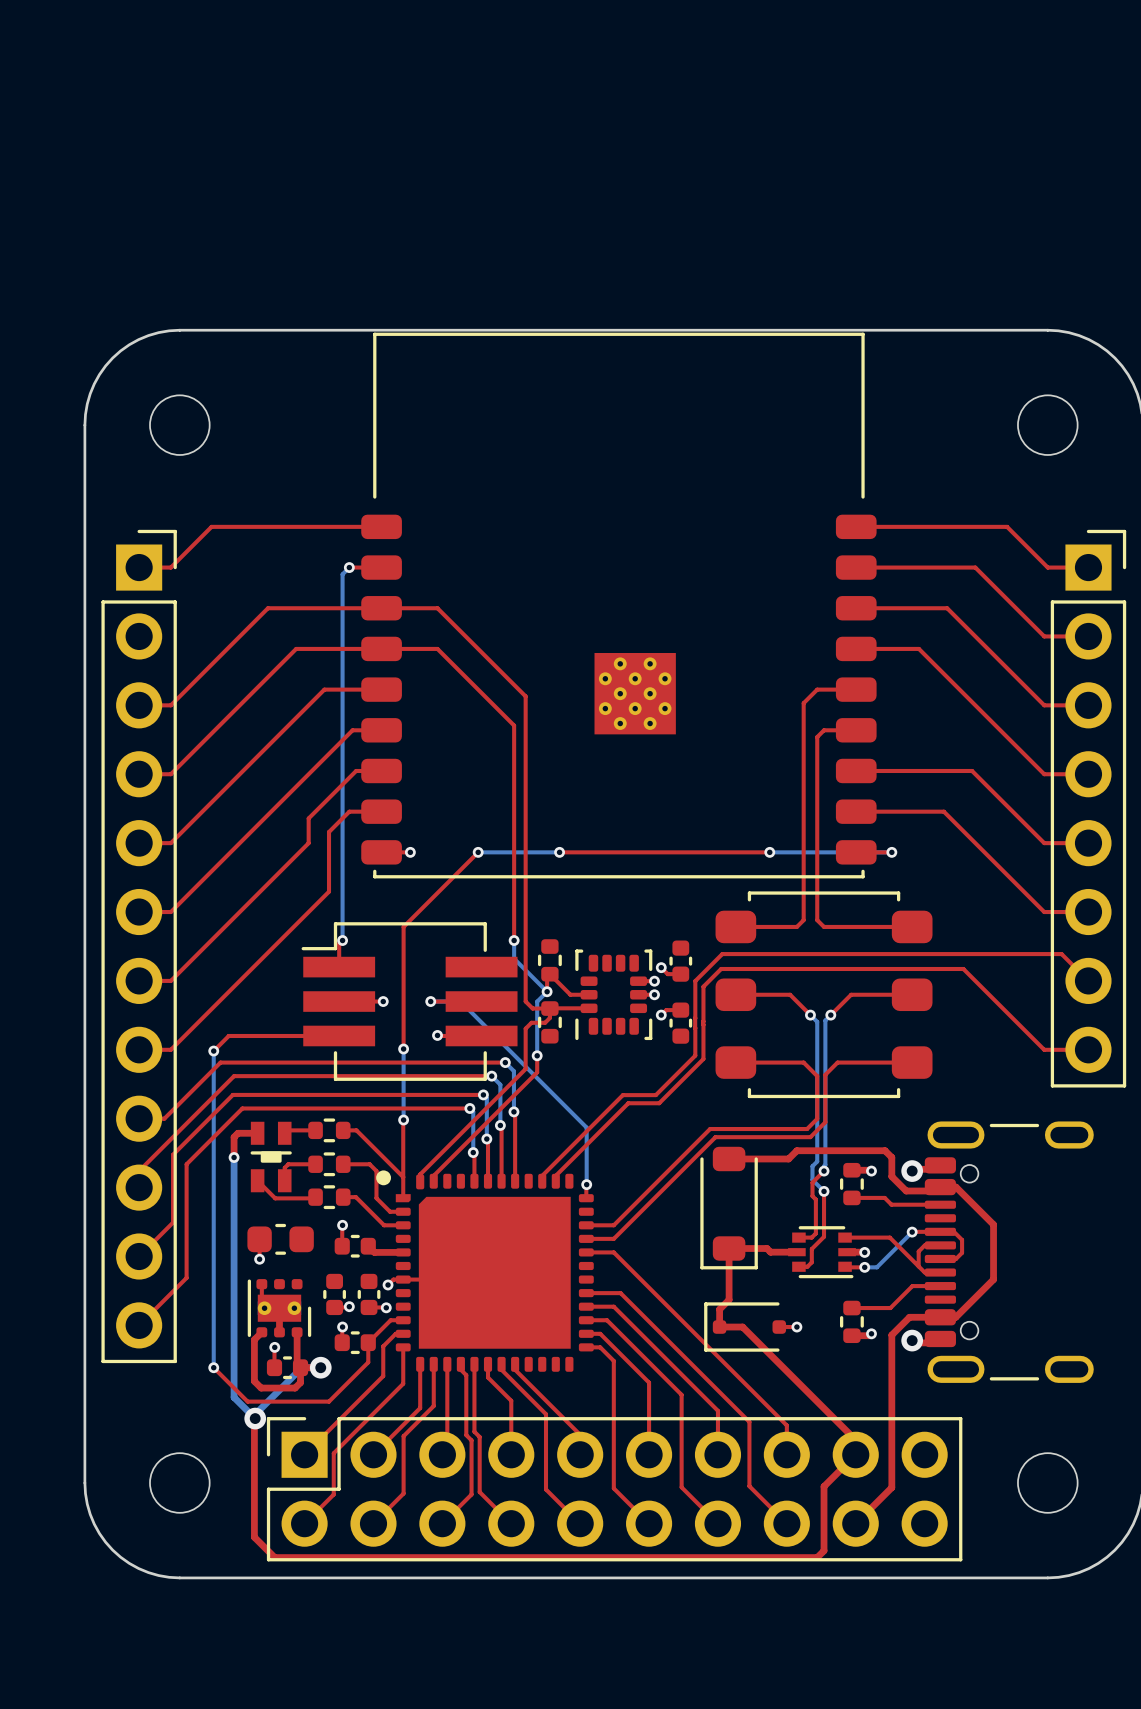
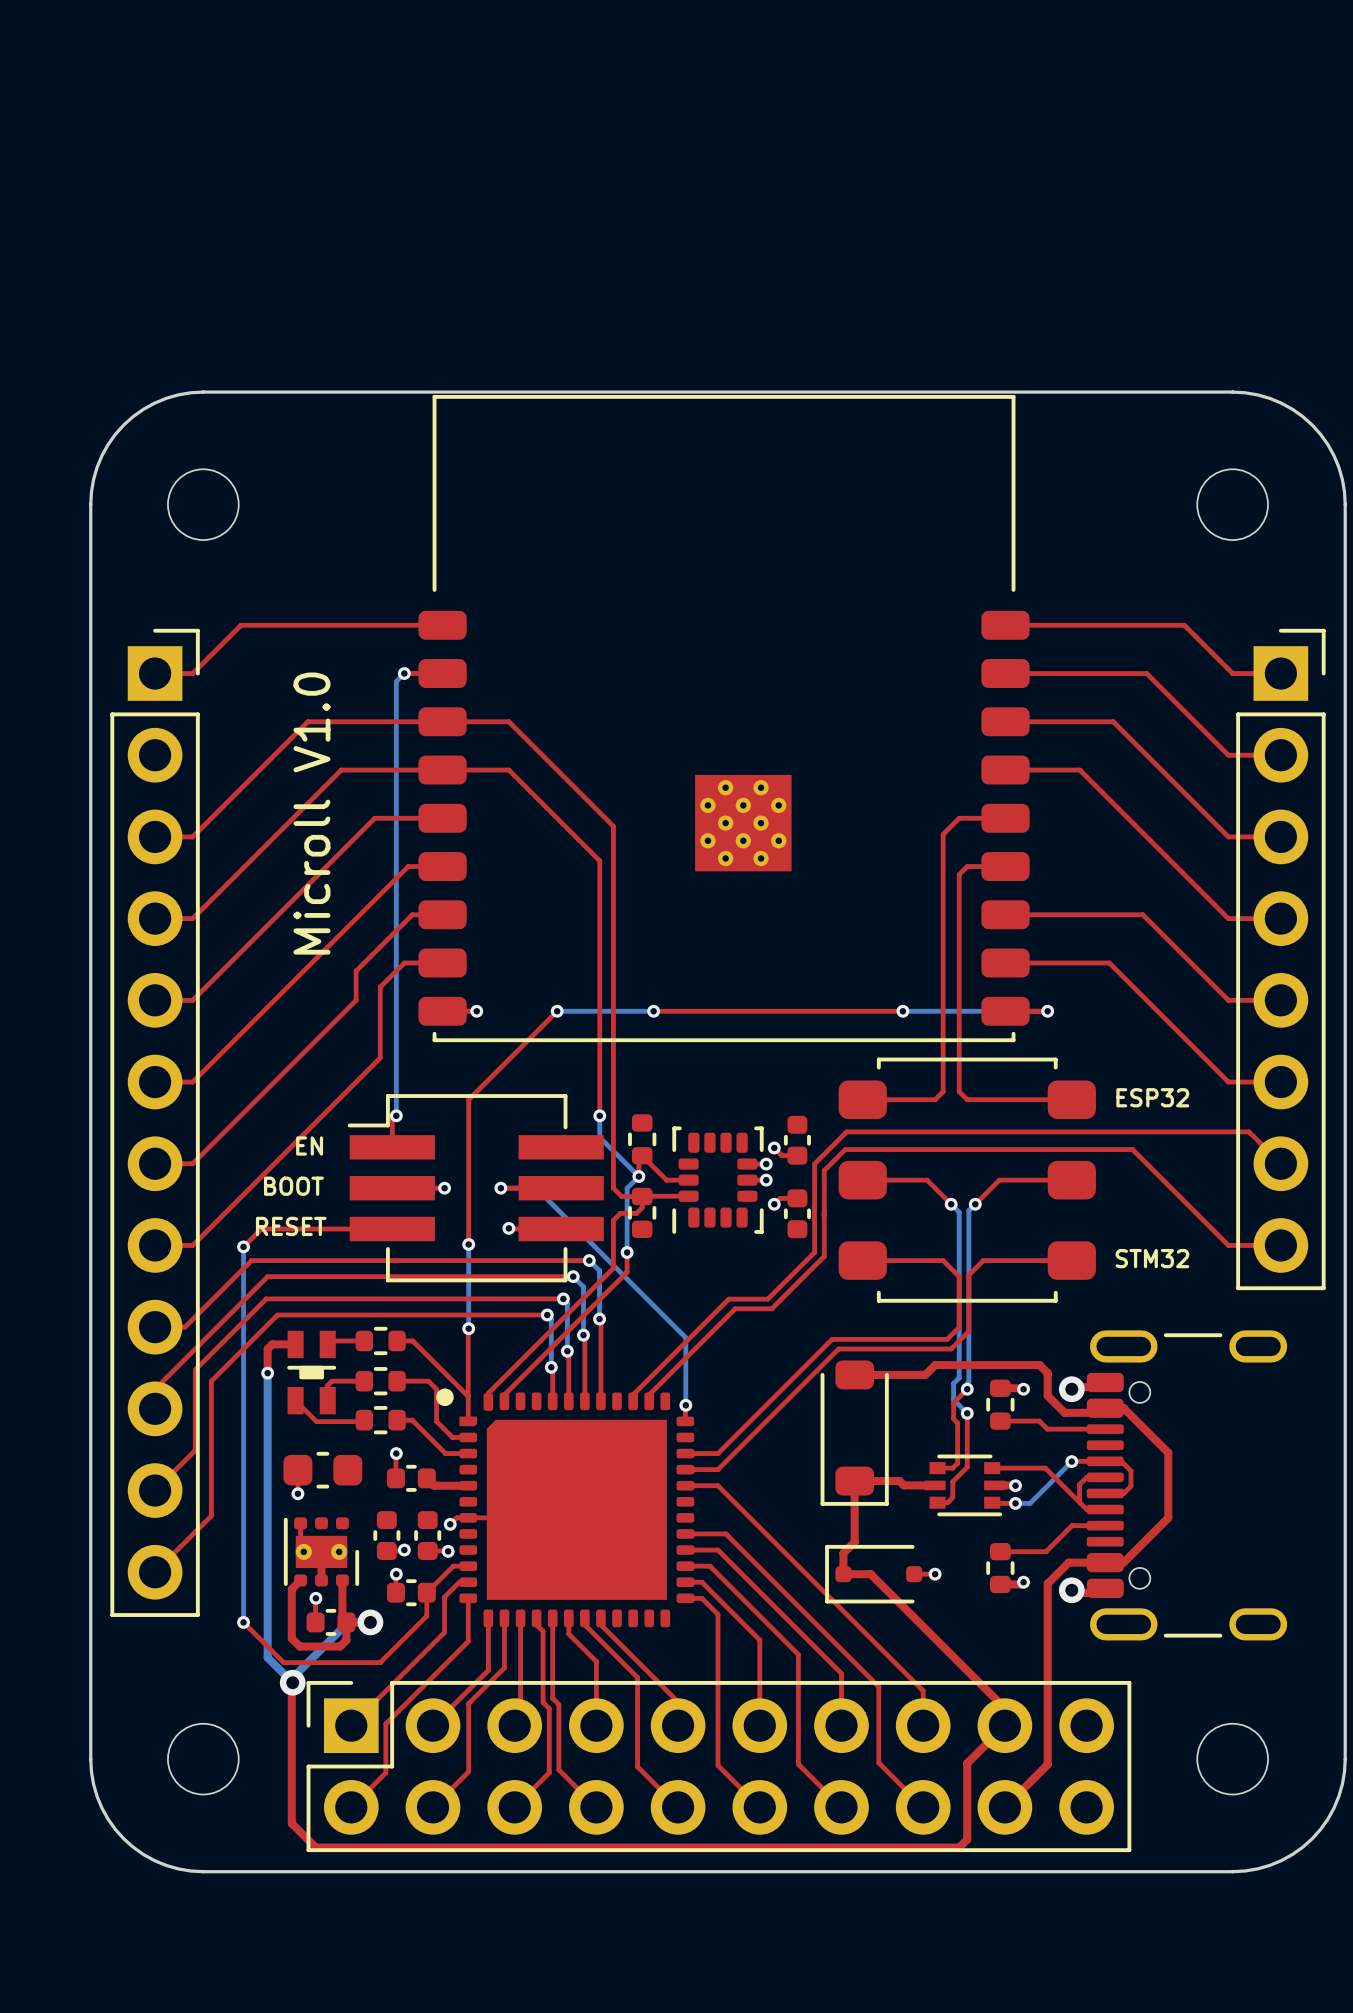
text: none -> Microll V1.0 (311, 813)
text: none -> ESP32 (1152, 1097)
text: none -> EN (309, 1146)
text: none -> BOOT (293, 1186)
text: none -> RESET (291, 1226)
text: none -> STM32 (1152, 1258)

